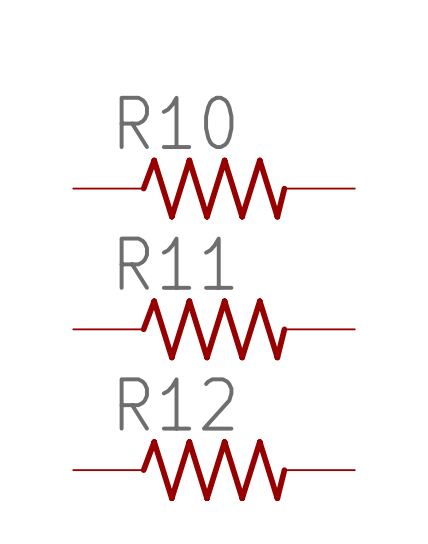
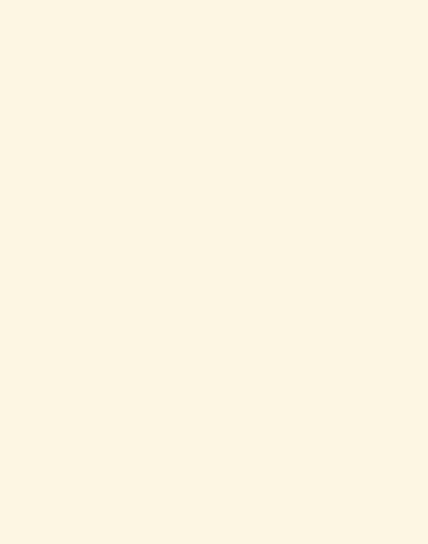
R10: (214, 188) -> none
R11: (214, 329) -> none
R12: (214, 470) -> none

